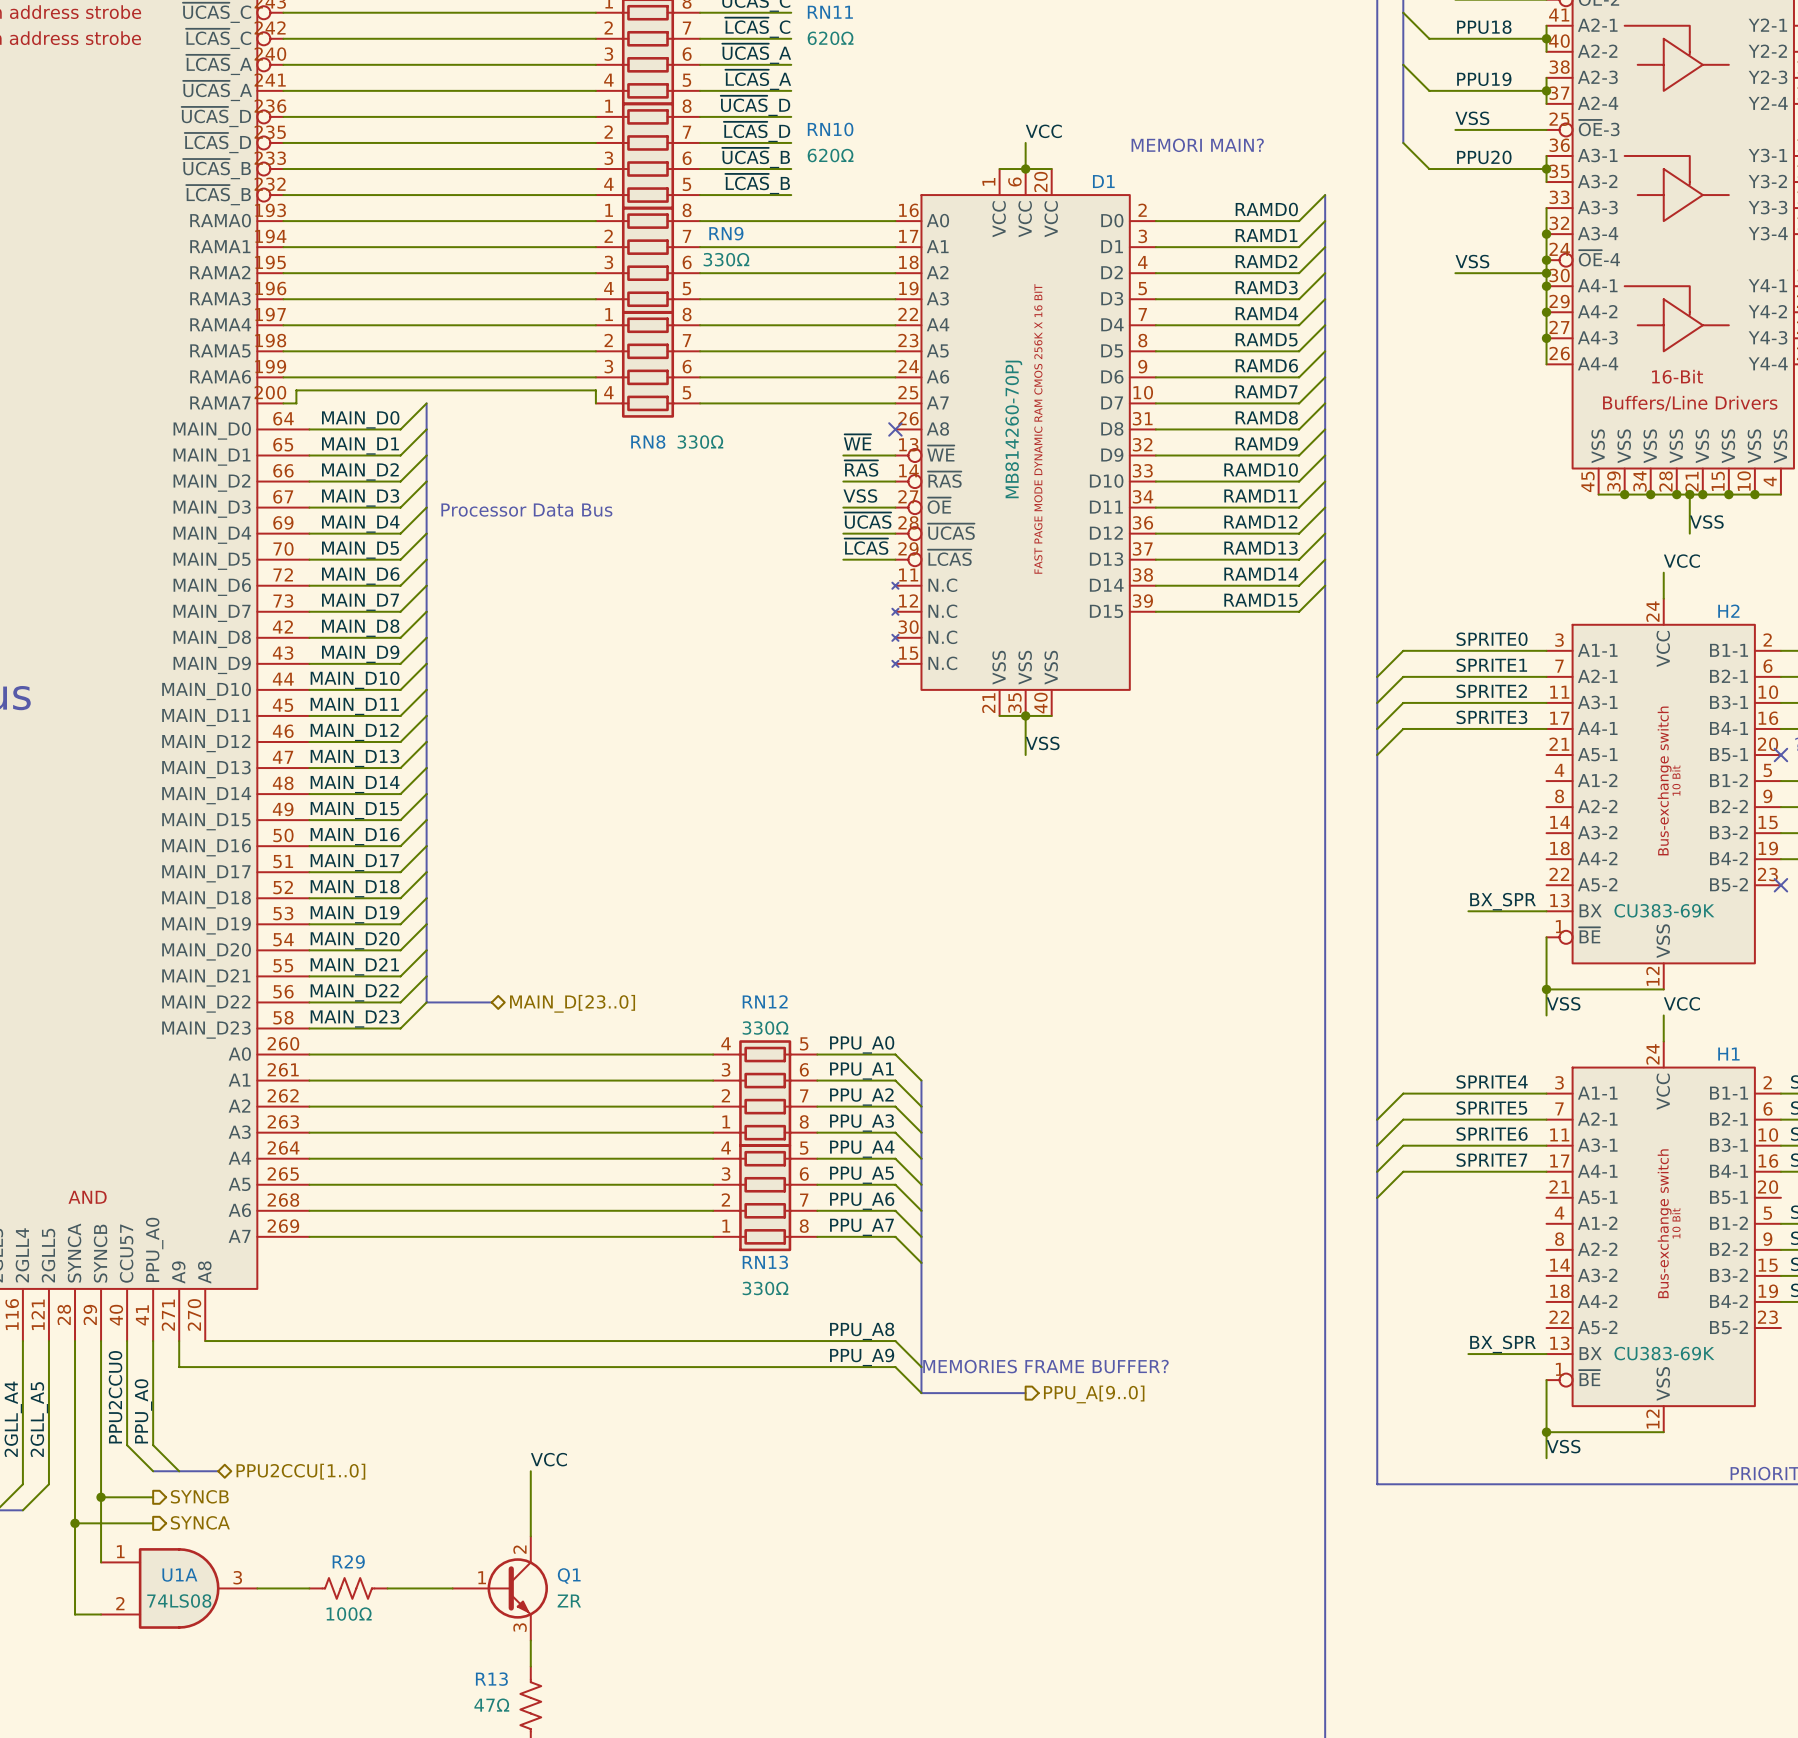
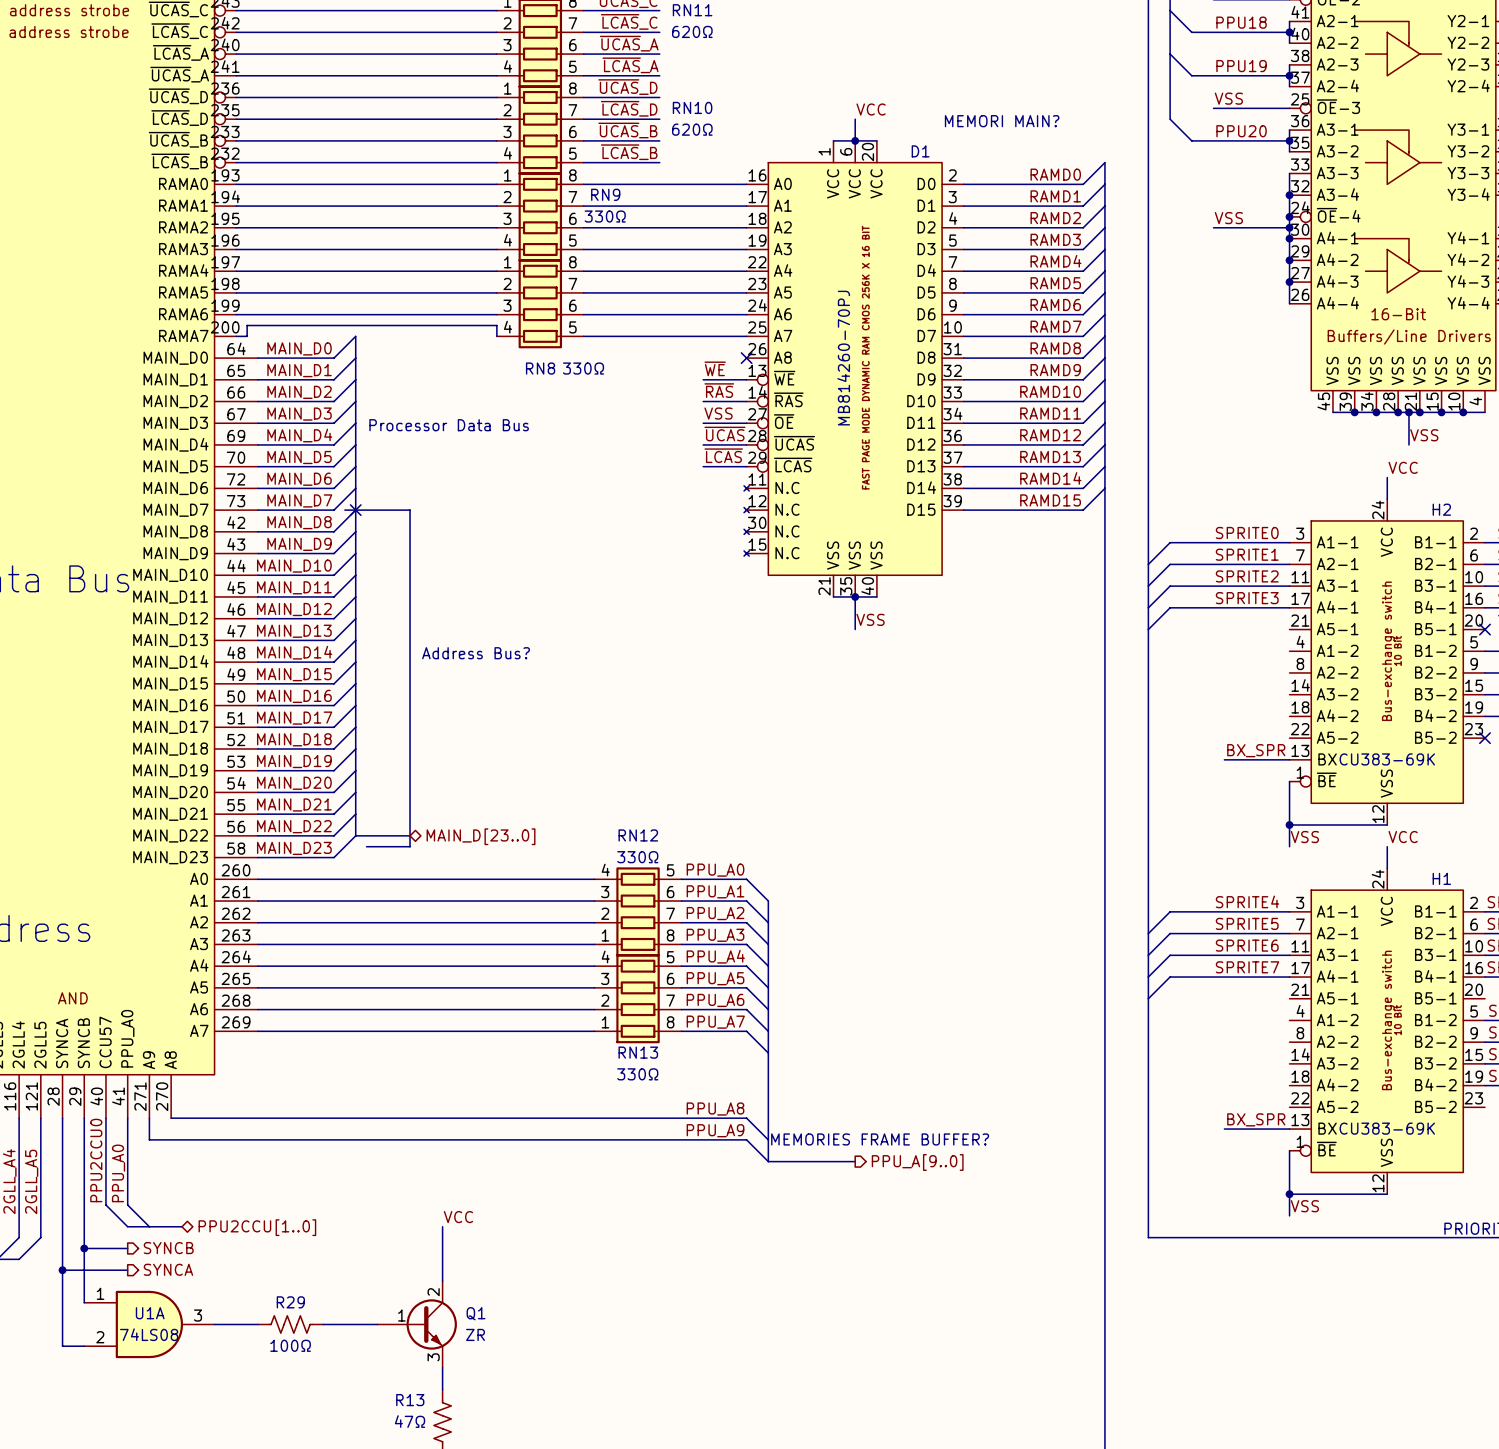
line: none -> (344, 510) (410, 510) (410, 846) (366, 846)
no-connect mark: none -> (355, 510)
text: none -> Address Bus? (476, 653)

